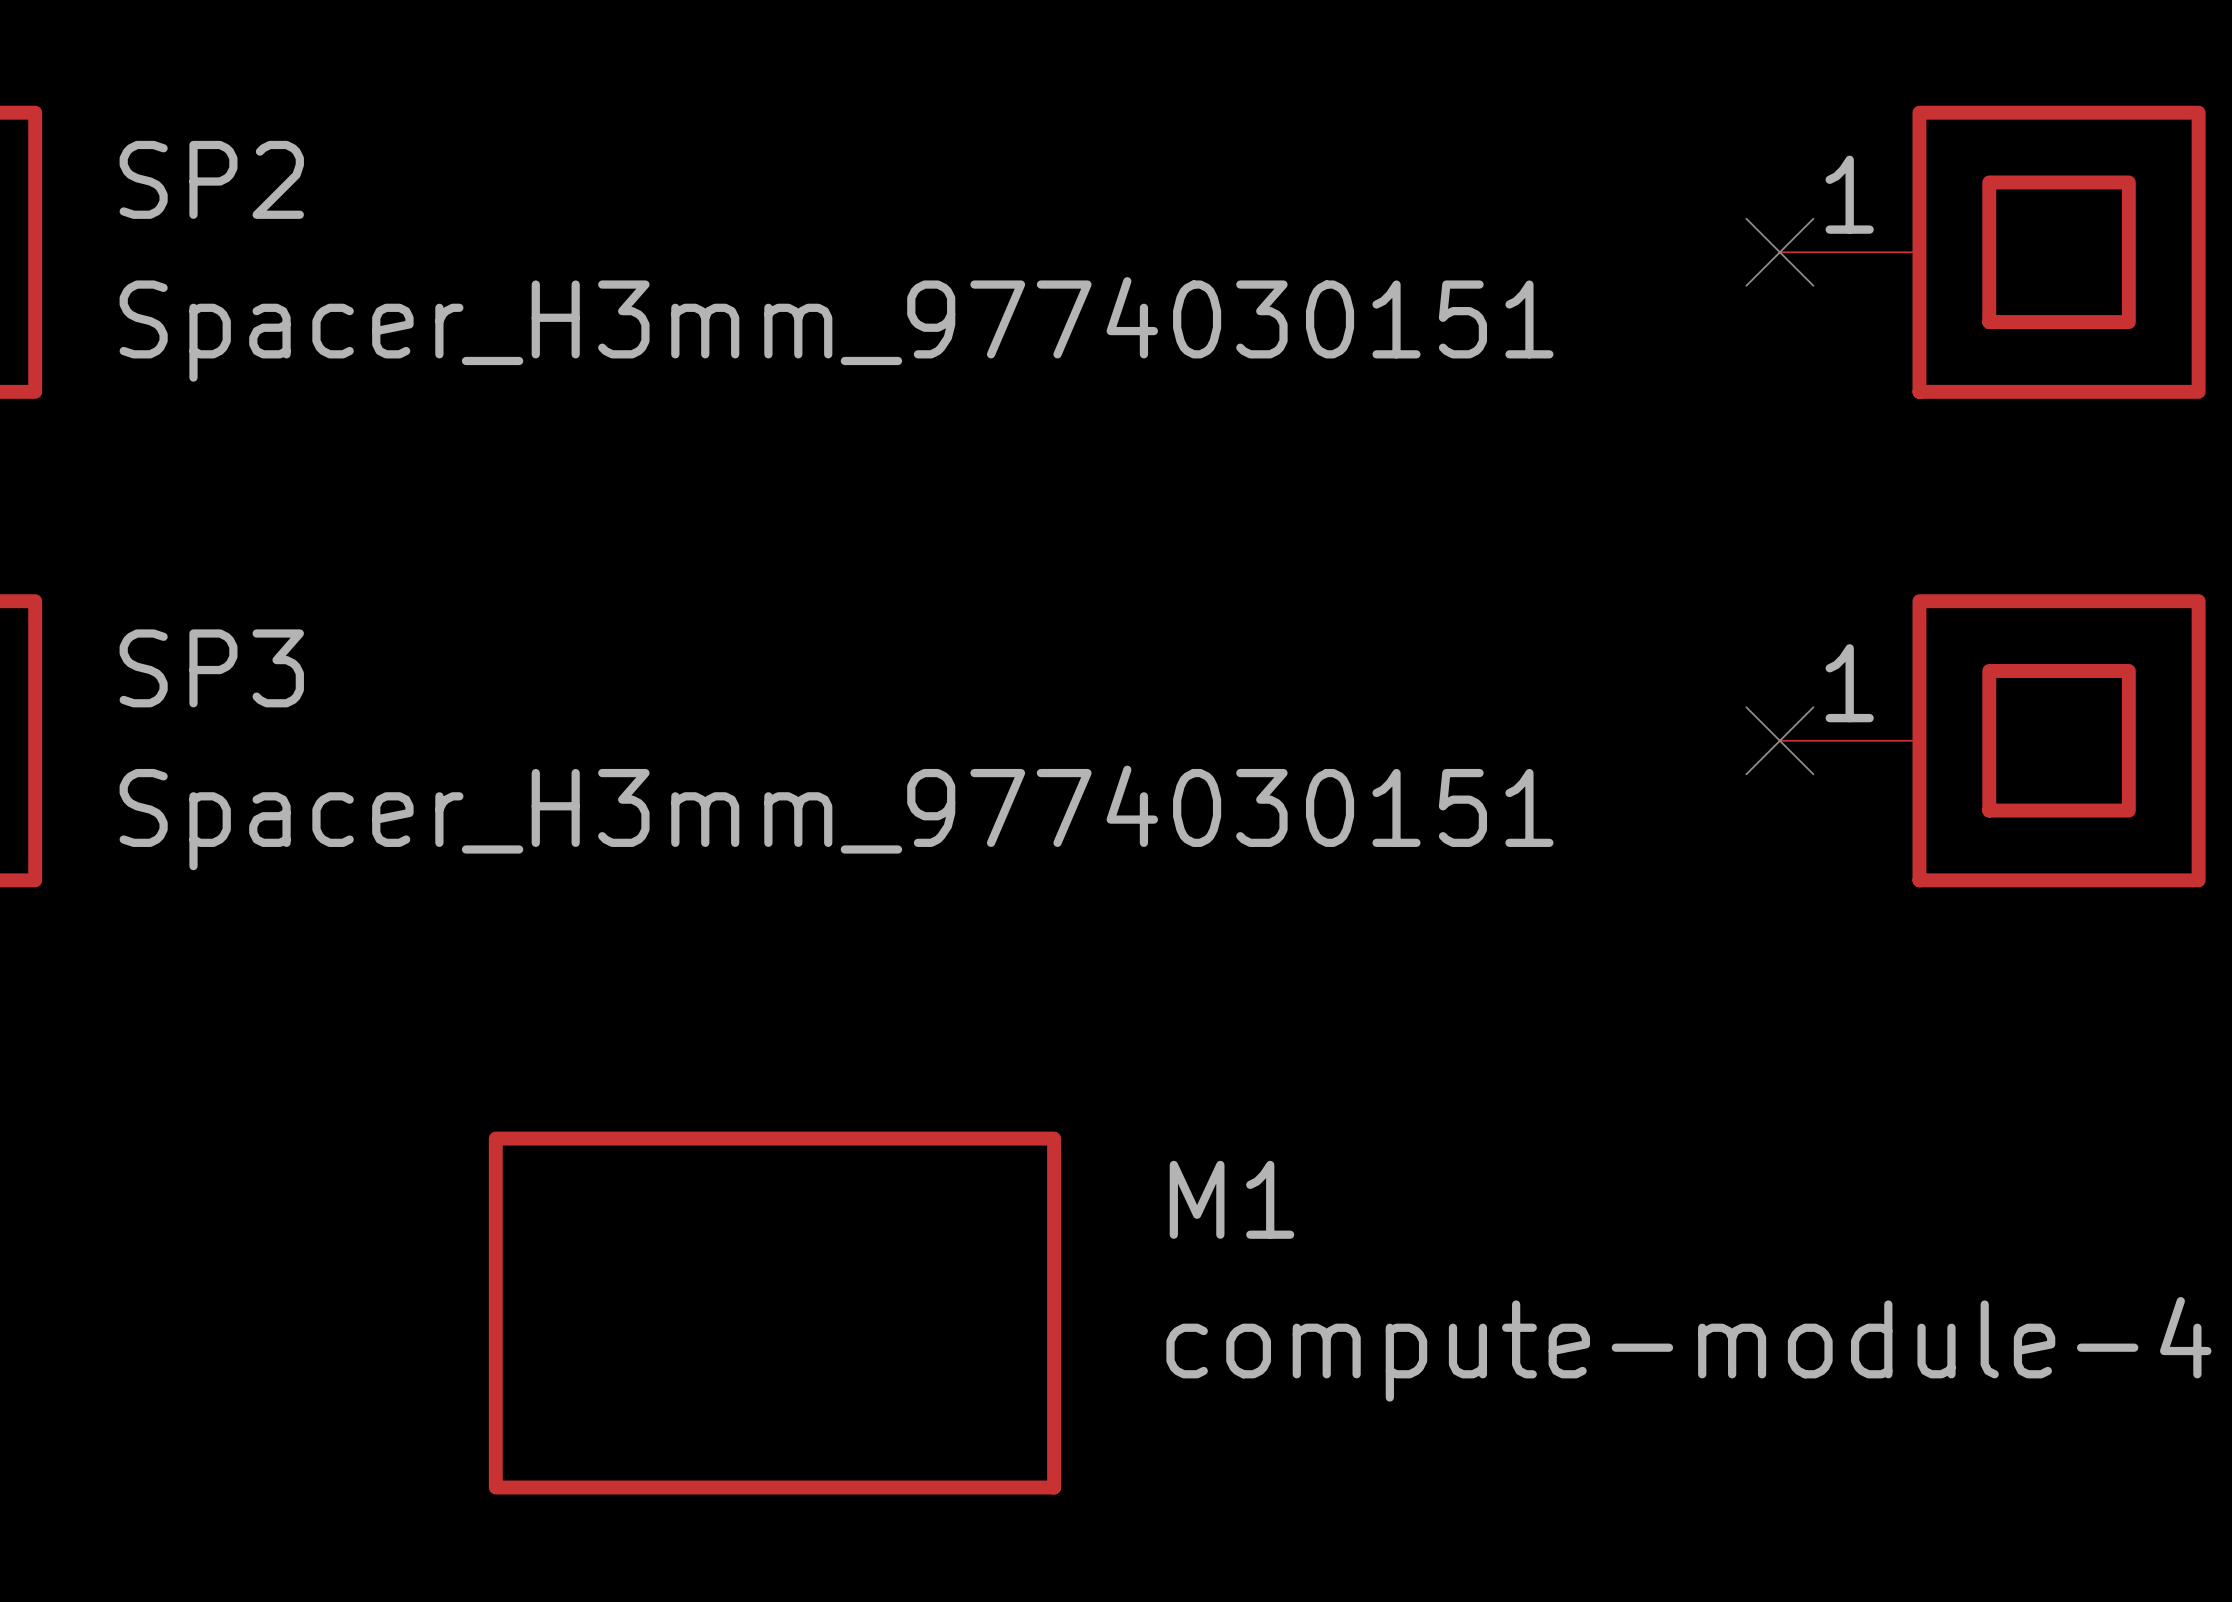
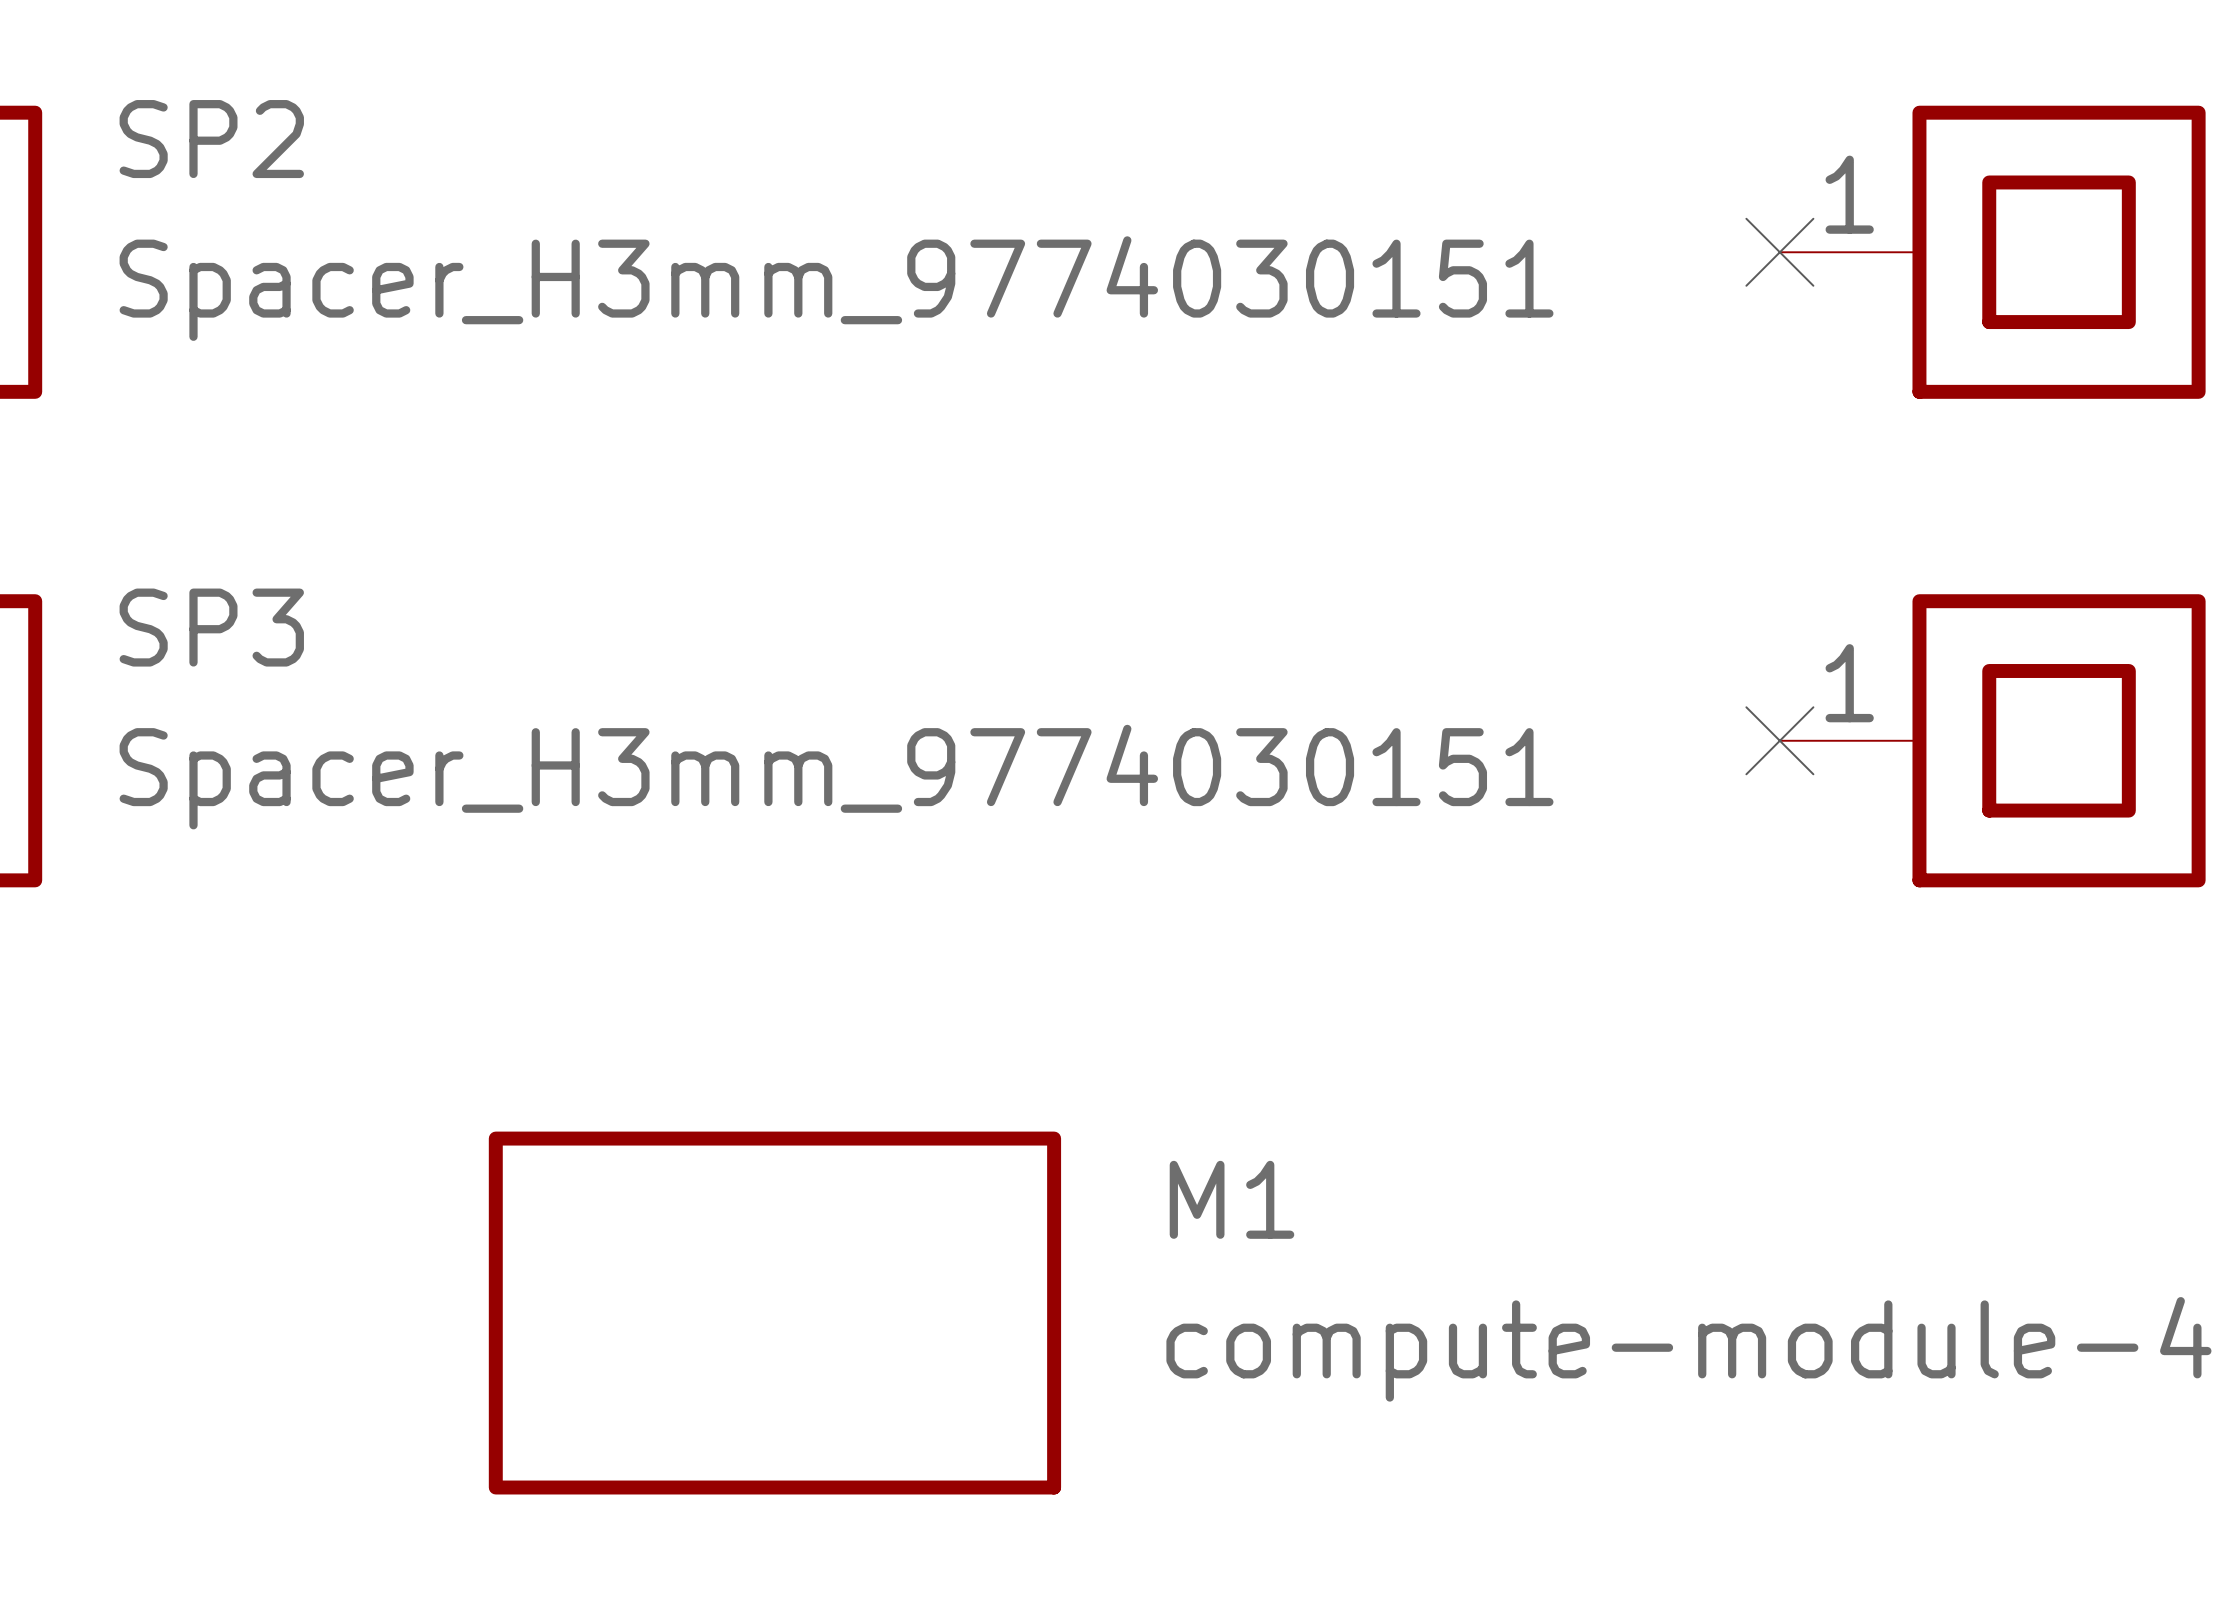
SP2 name position: SP2 (211, 179) -> SP2 (211, 139)
SP2 value position: Spacer_H3mm_9774030151 (836, 329) -> Spacer_H3mm_9774030151 (836, 288)
SP3 name position: SP3 (211, 668) -> SP3 (211, 627)
SP3 value position: Spacer_H3mm_9774030151 (836, 817) -> Spacer_H3mm_9774030151 (836, 777)

